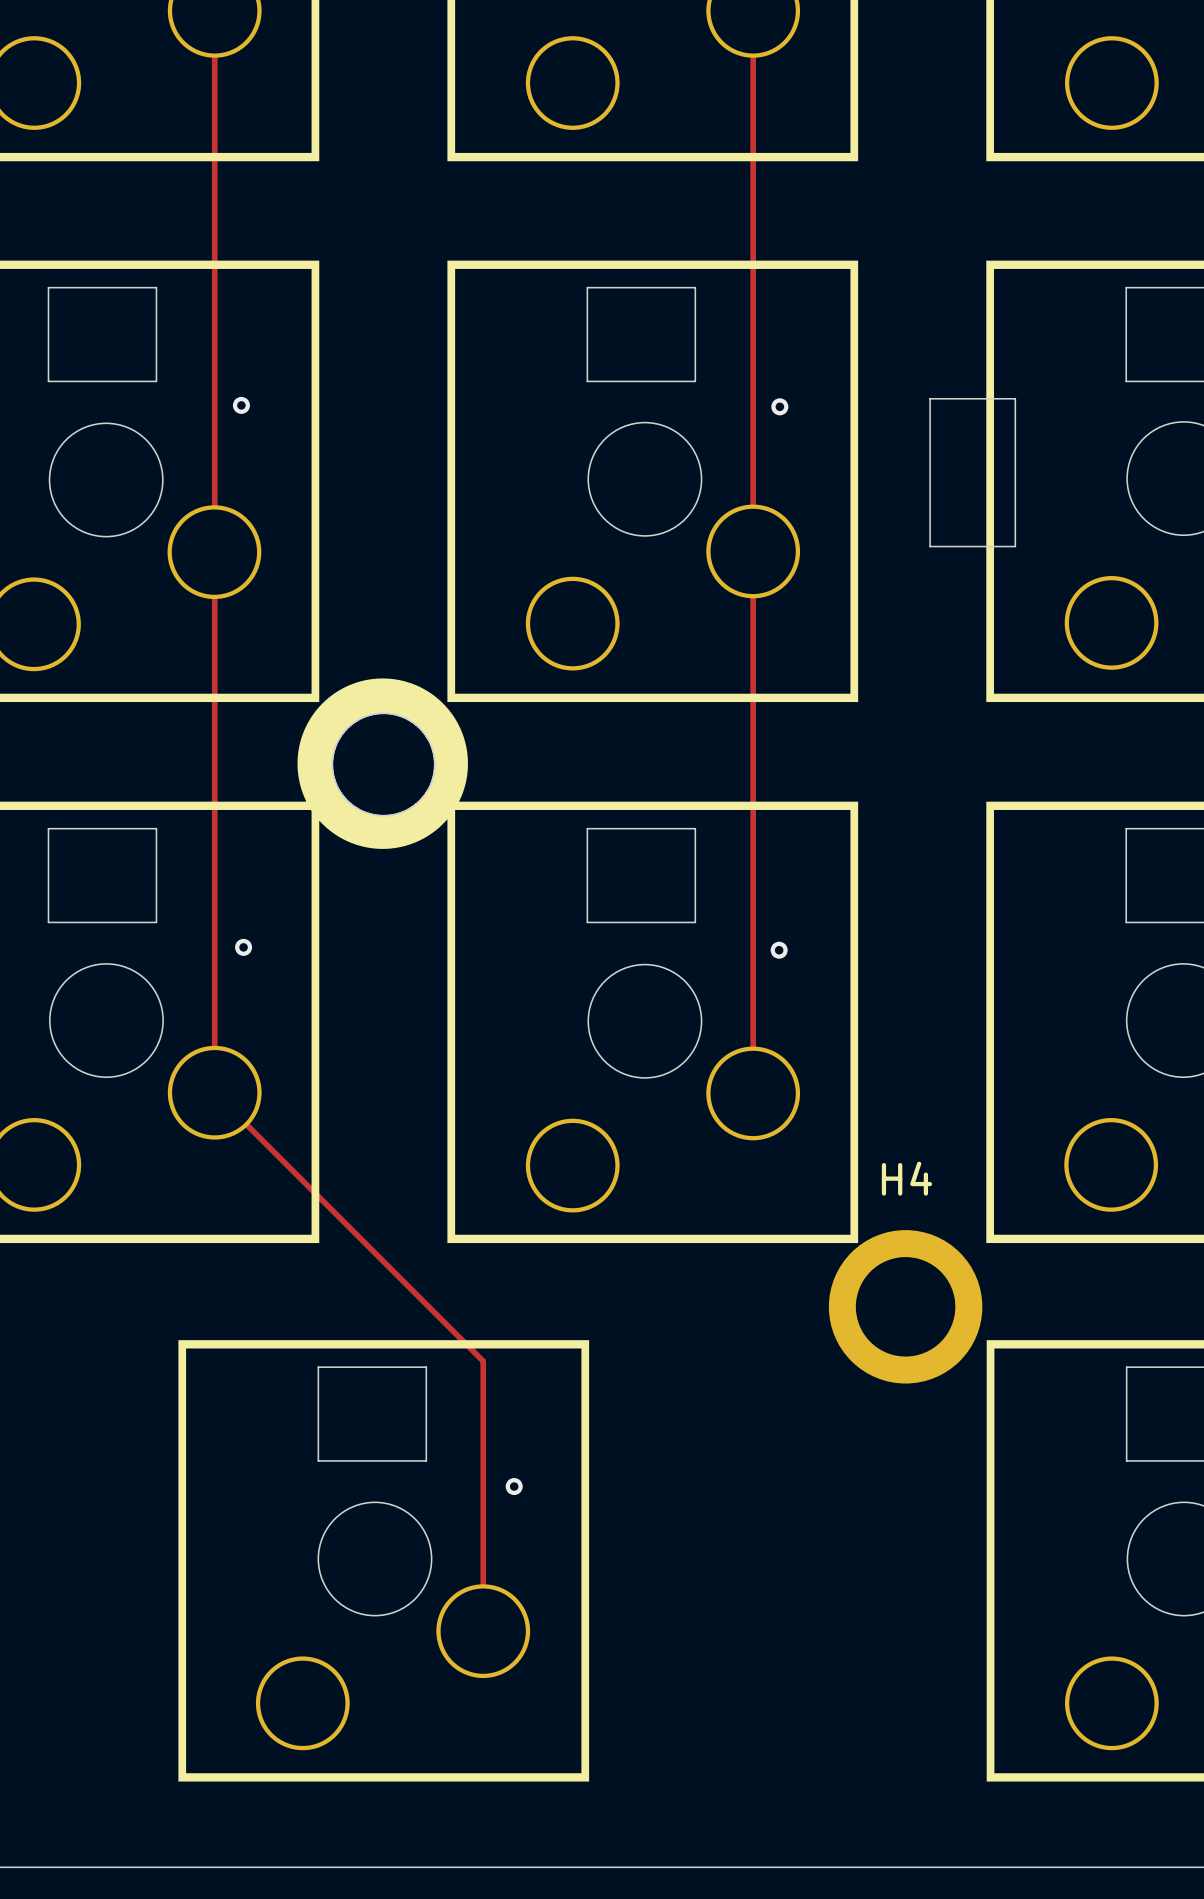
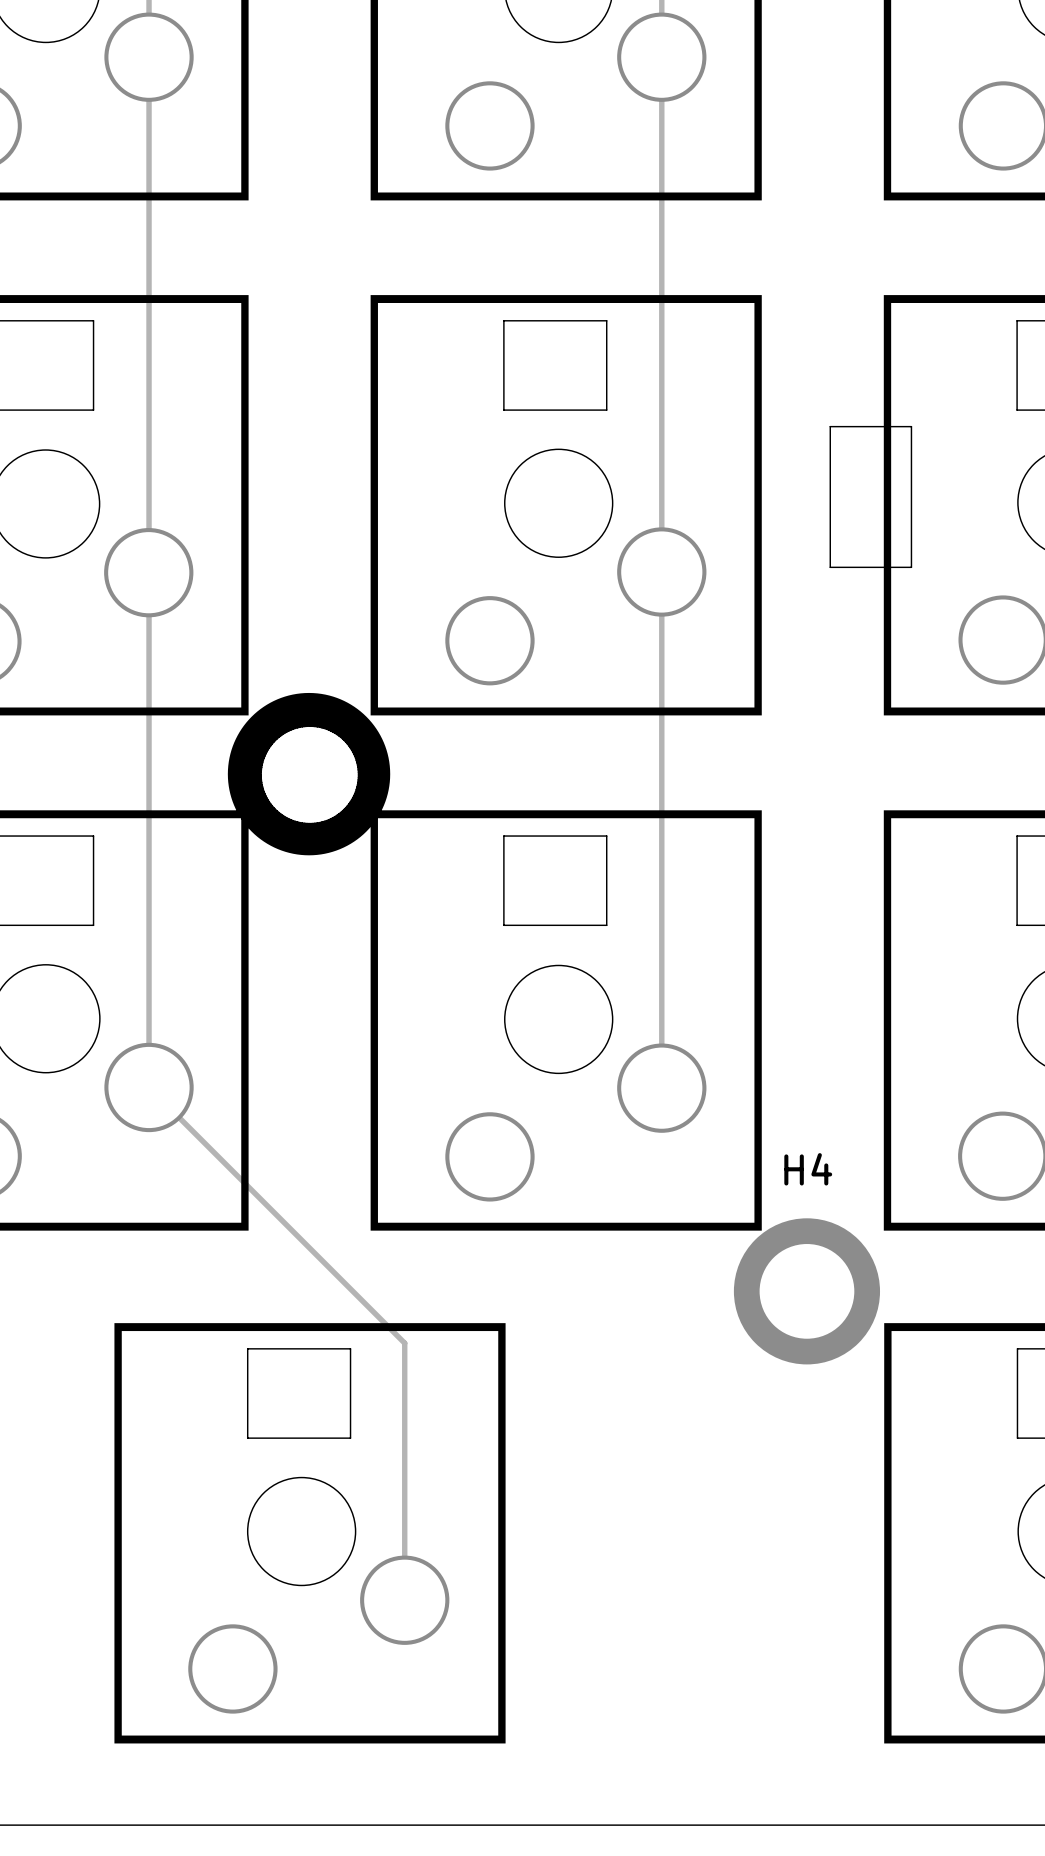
via: (241, 405) -> none
via: (779, 406) -> none
via: (243, 947) -> none
via: (779, 950) -> none
via: (514, 1486) -> none

